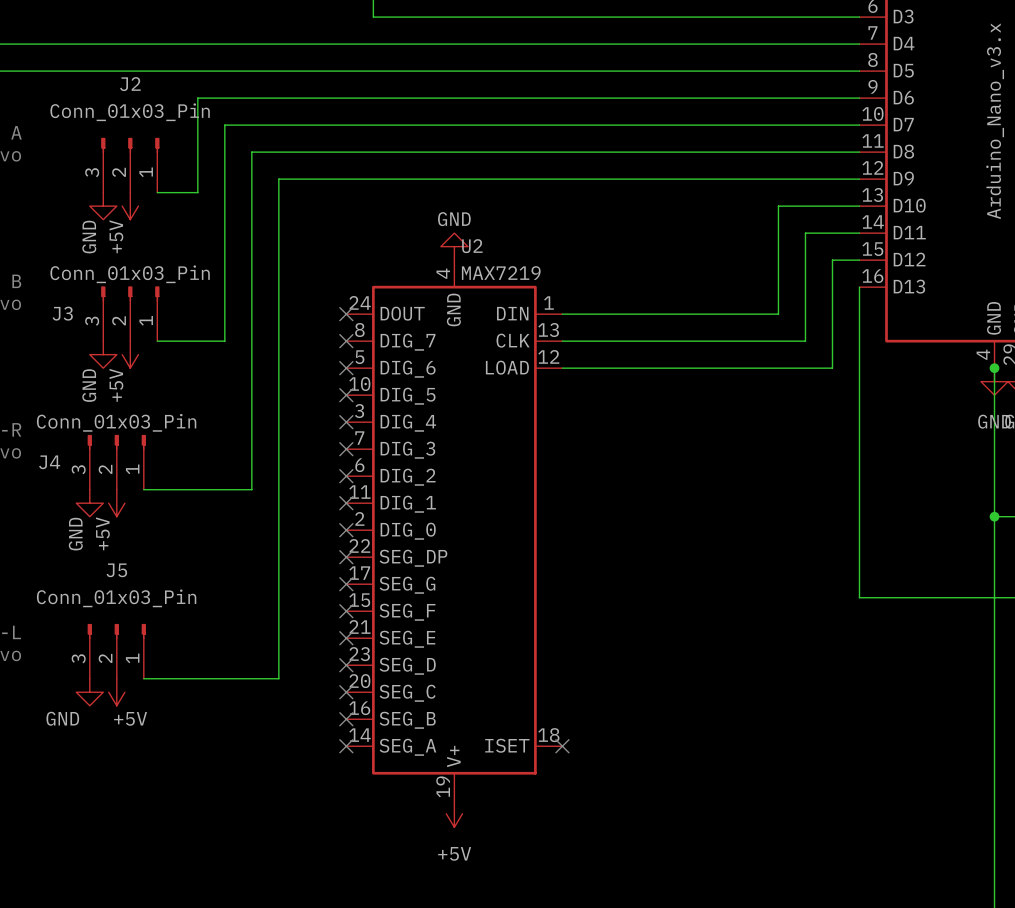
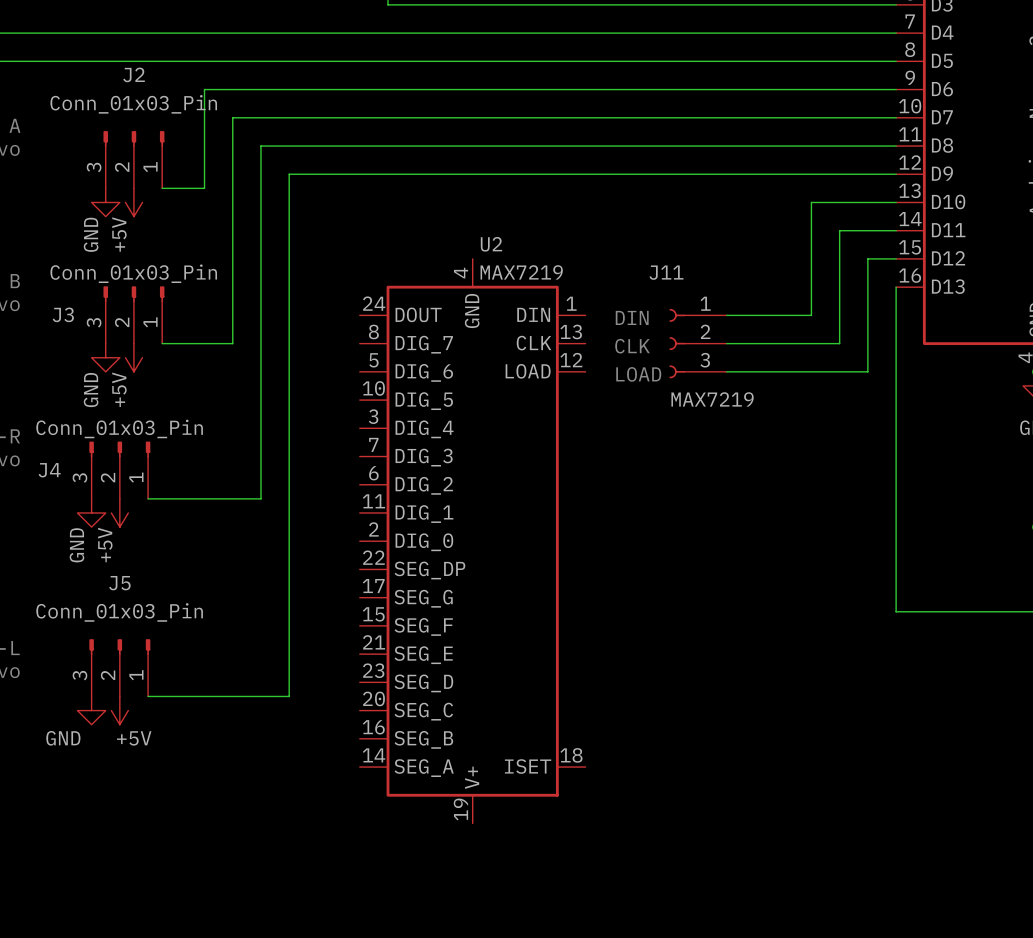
power symbol: GND (454, 246) -> none
no-connect mark: (346, 314) -> none
wire: (562, 314) (697, 314) -> none
text: none -> DIN (632, 317)
no-connect mark: (346, 341) -> none
wire: (562, 341) (697, 341) -> none
J11: none -> MAX7219 (698, 343)
text: none -> CLK (632, 346)
no-connect mark: (346, 368) -> none
wire: (562, 368) (697, 368) -> none
text: none -> LOAD (638, 374)
no-connect mark: (346, 395) -> none
no-connect mark: (346, 422) -> none
no-connect mark: (346, 449) -> none
no-connect mark: (346, 476) -> none
no-connect mark: (346, 503) -> none
no-connect mark: (346, 530) -> none
no-connect mark: (346, 557) -> none
no-connect mark: (346, 584) -> none
no-connect mark: (346, 611) -> none
no-connect mark: (346, 638) -> none
no-connect mark: (346, 665) -> none
no-connect mark: (346, 692) -> none
no-connect mark: (346, 719) -> none
no-connect mark: (346, 746) -> none
no-connect mark: (562, 746) -> none
power symbol: +5V (454, 813) -> none

